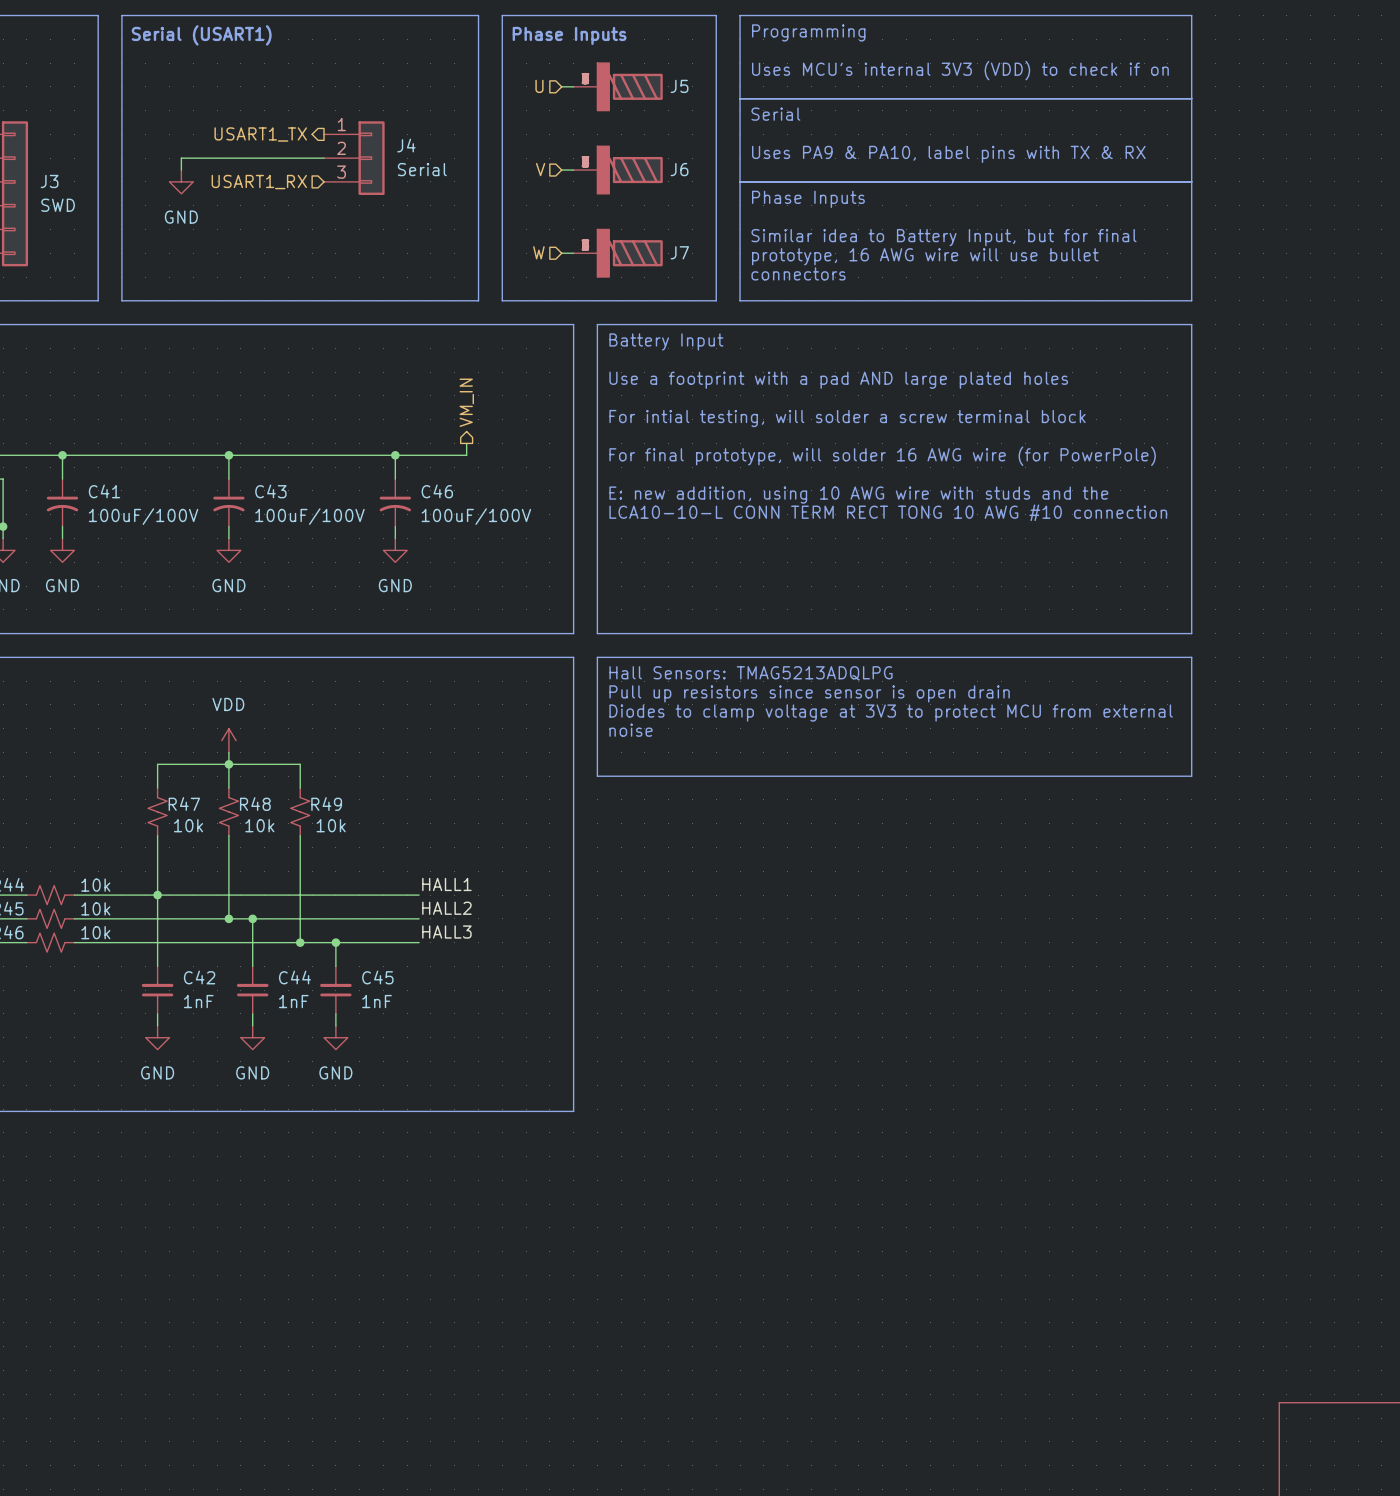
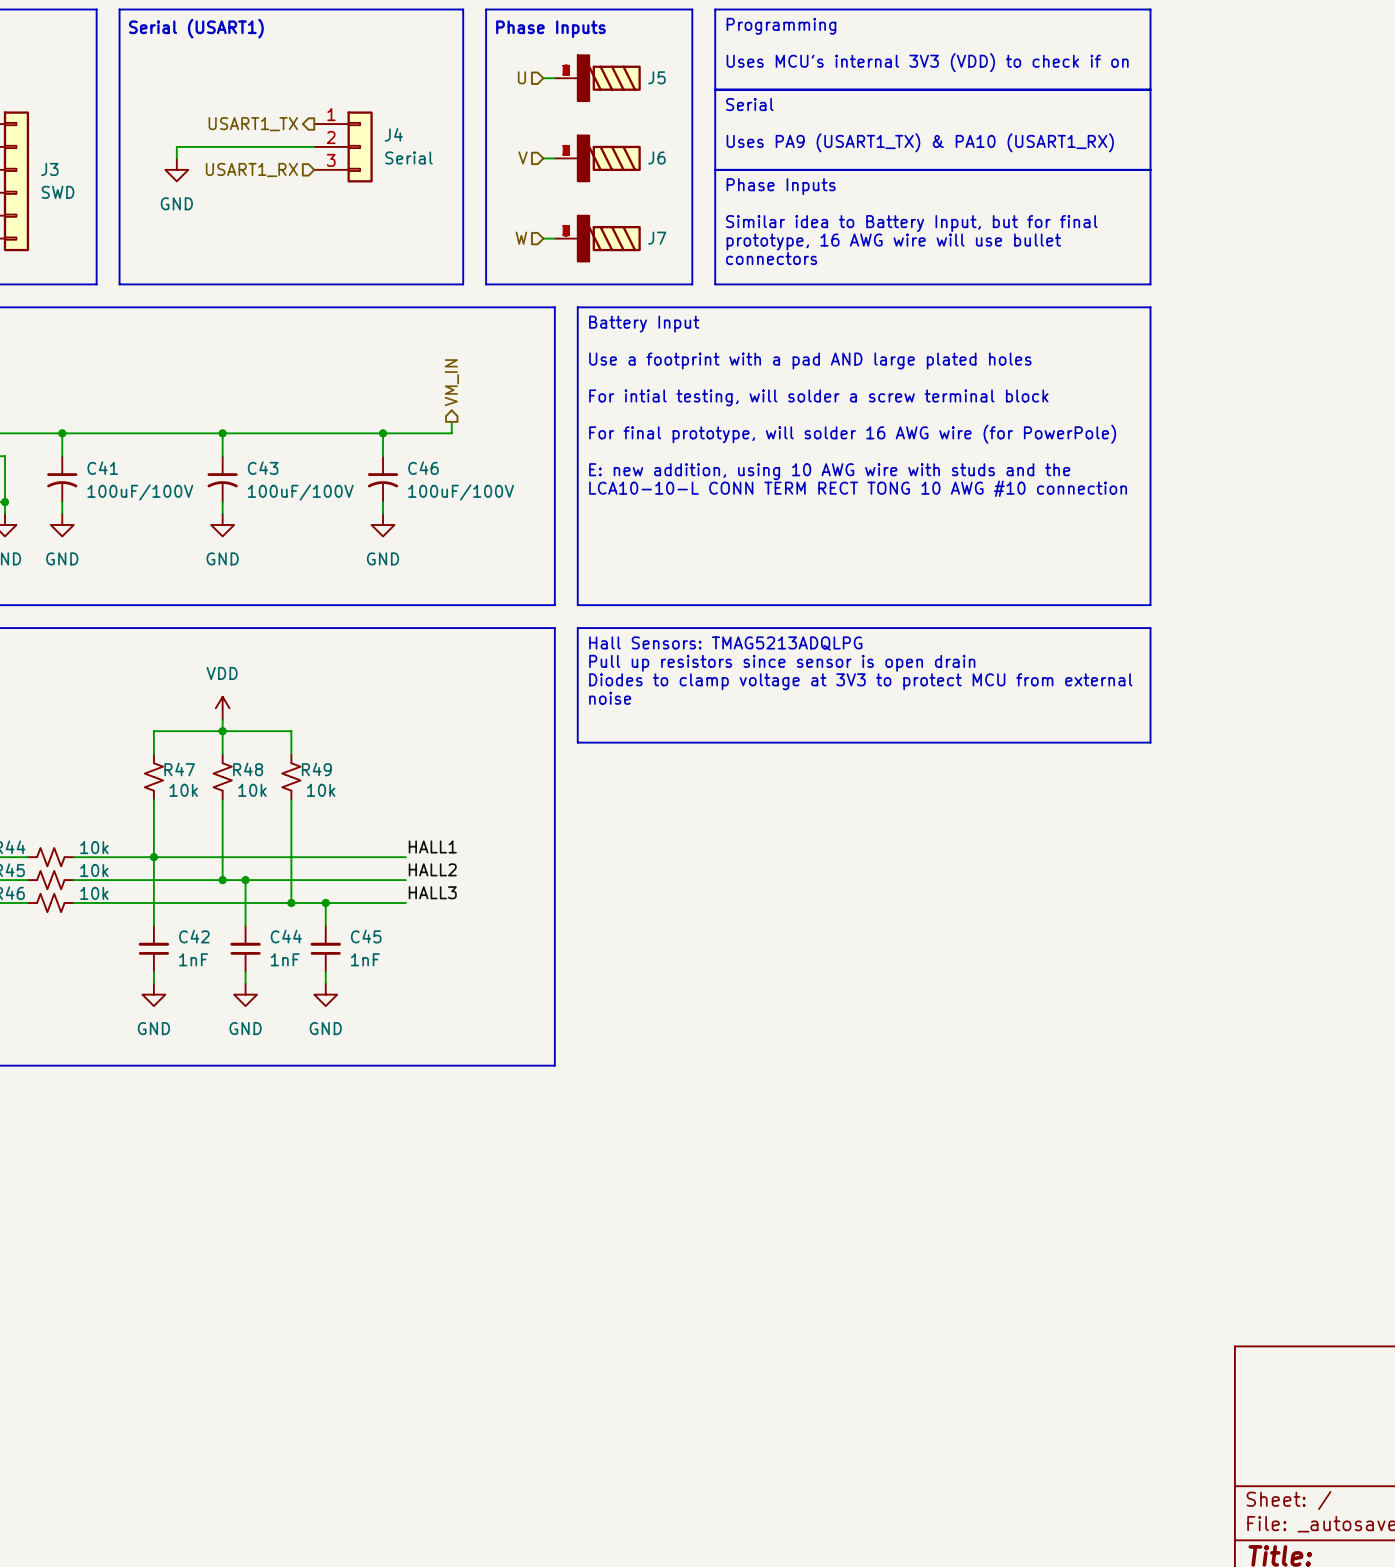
text: Uses PA9 & PA10, label pins with TX & RX (948, 154) -> Uses PA9 (USART1_TX) & PA10 (USART1_RX) (920, 142)

